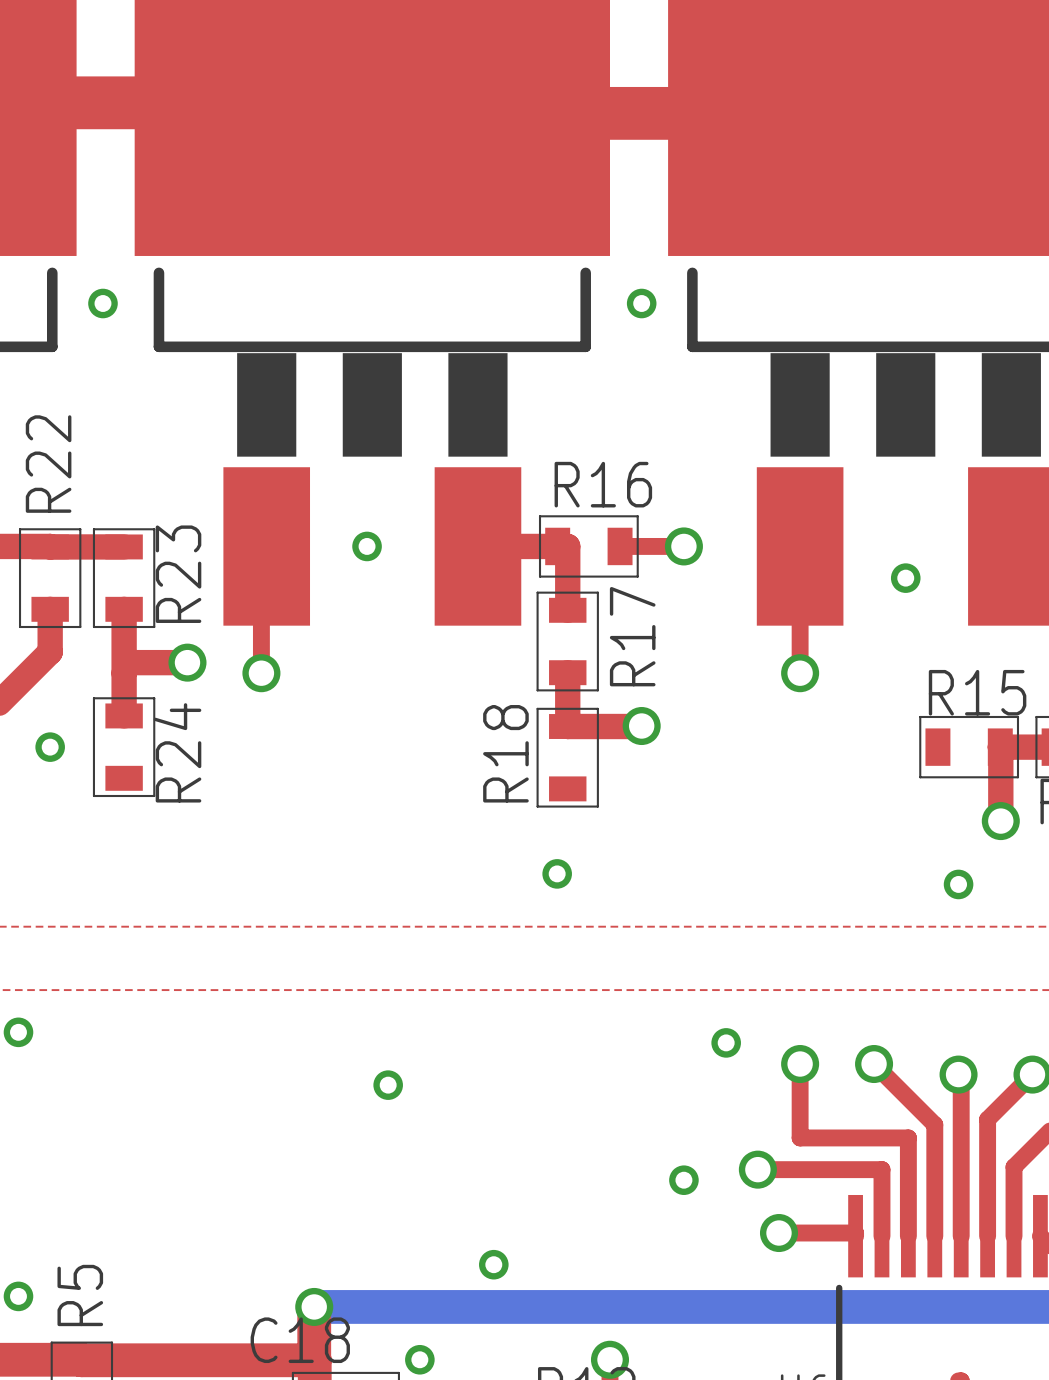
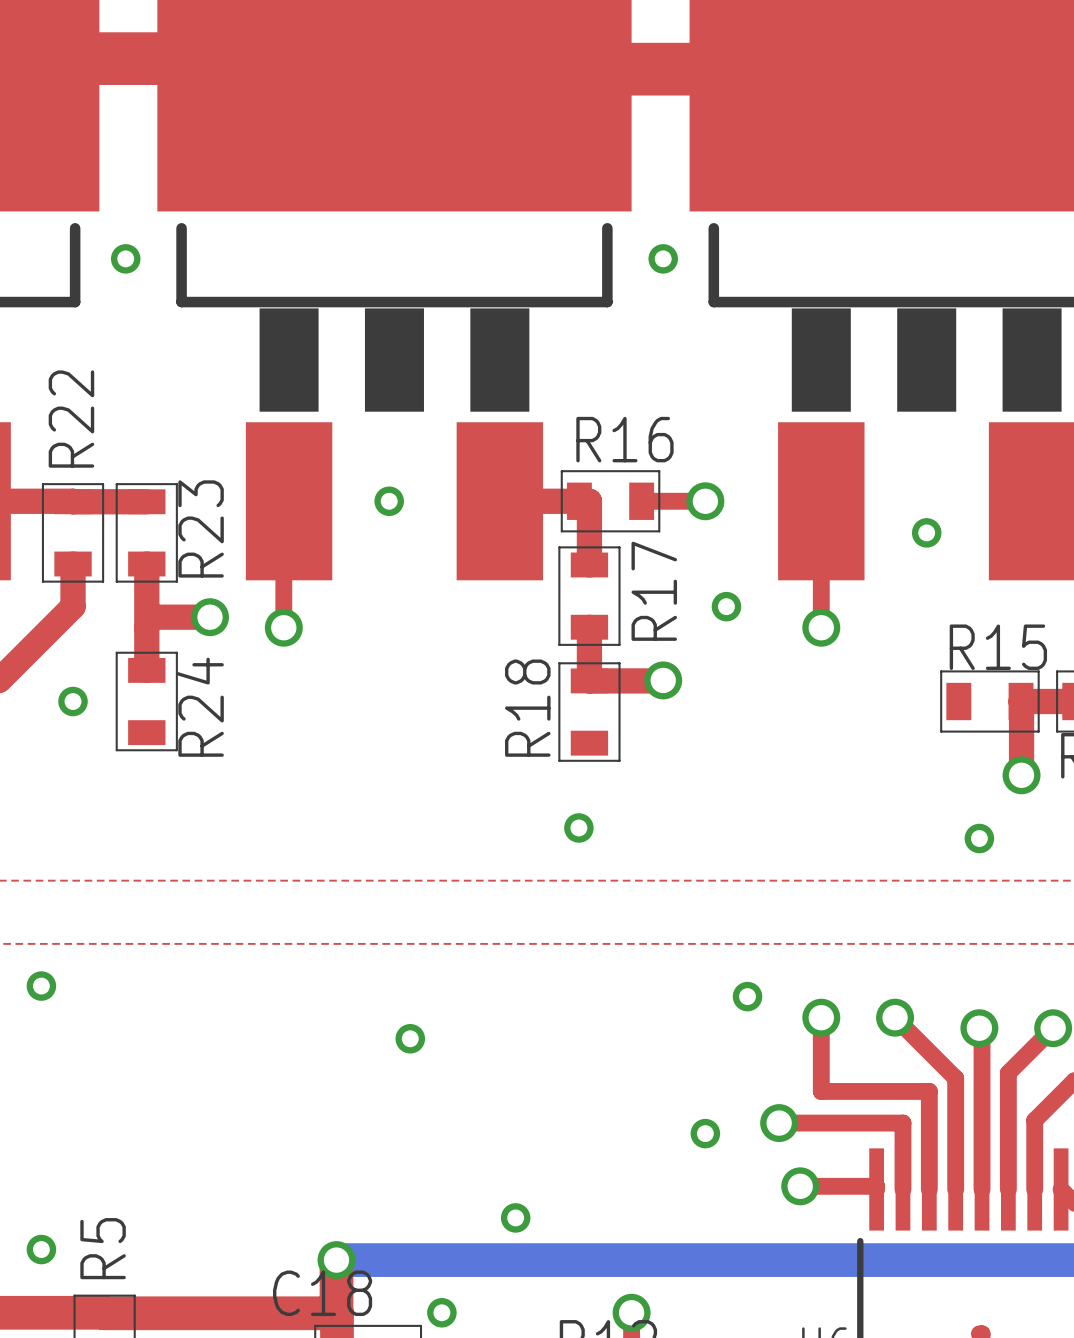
via: none -> (726, 606)

